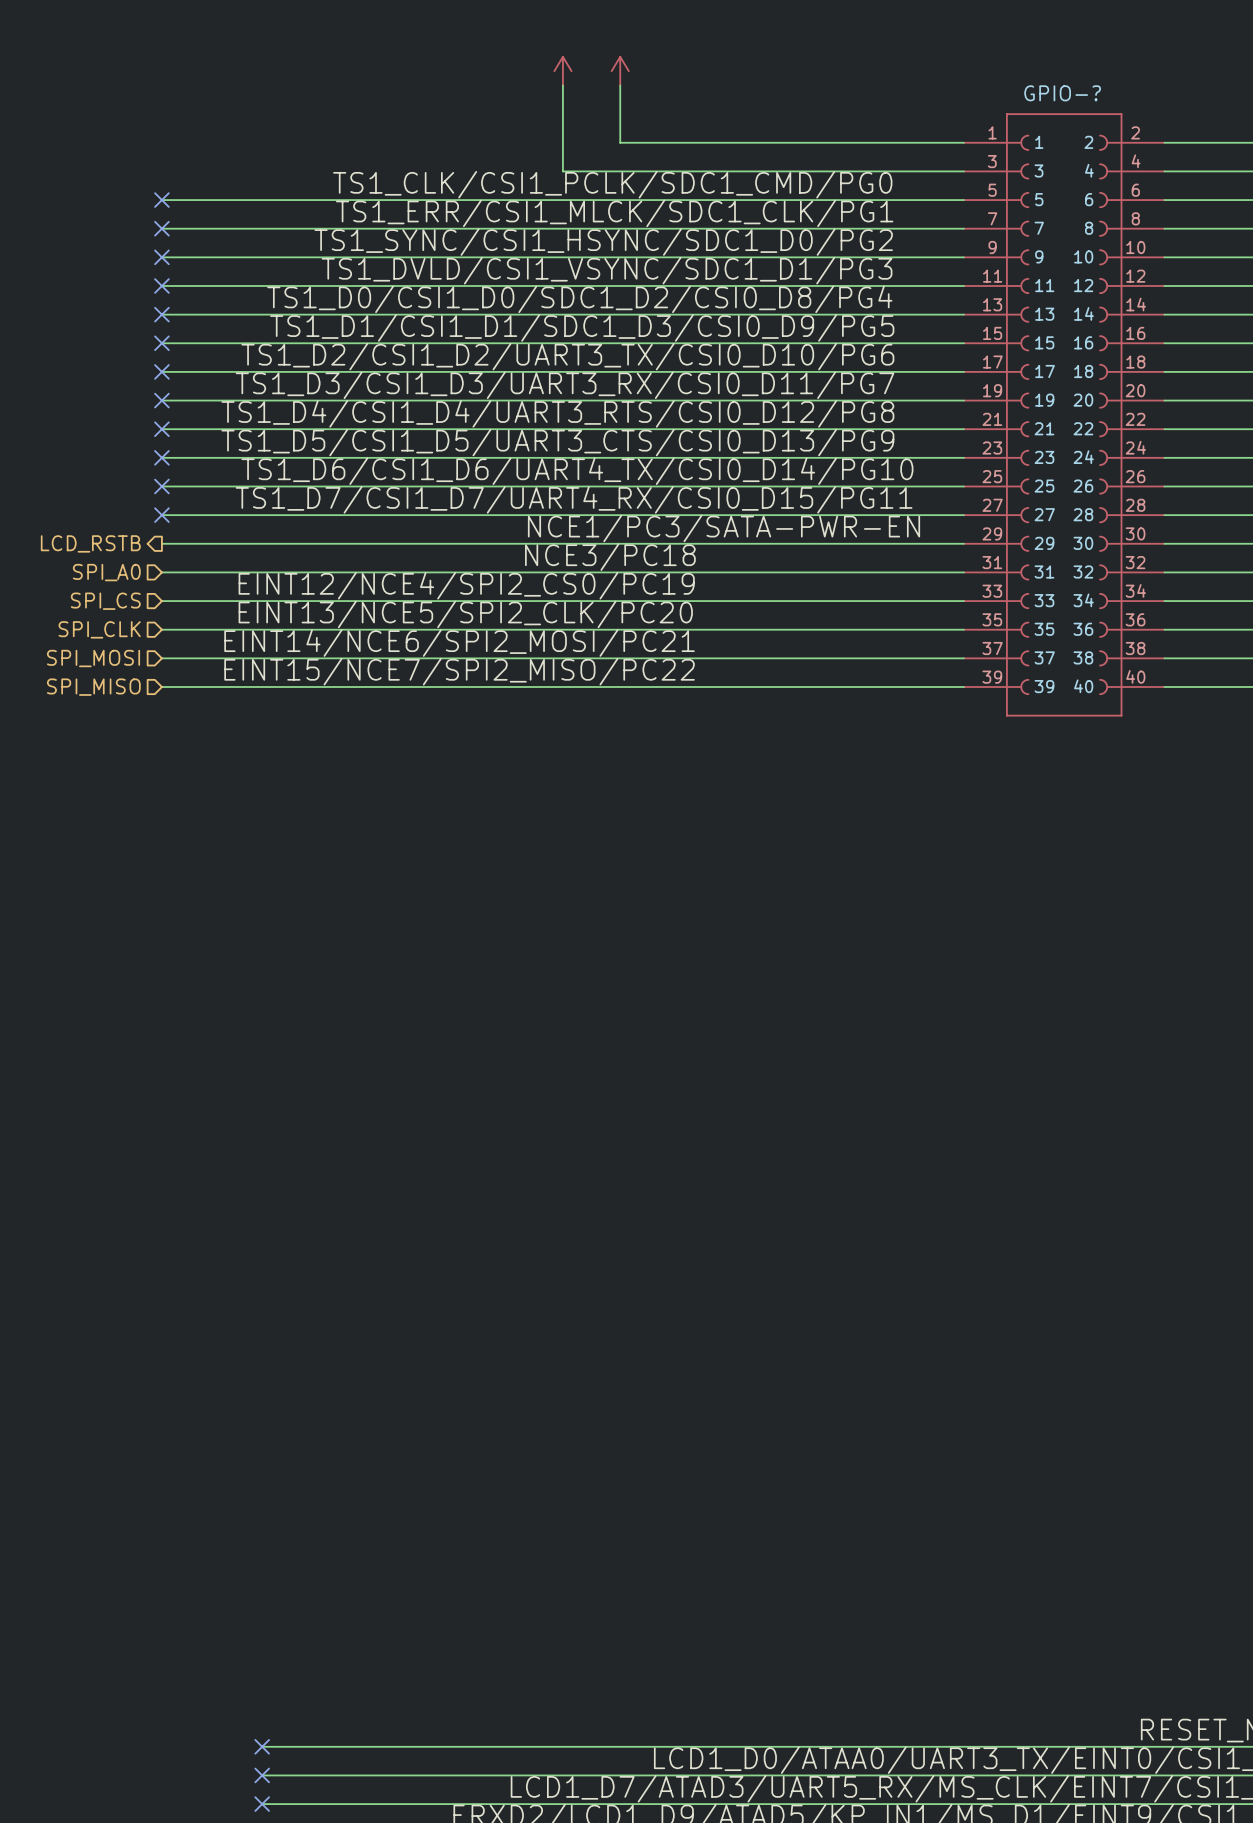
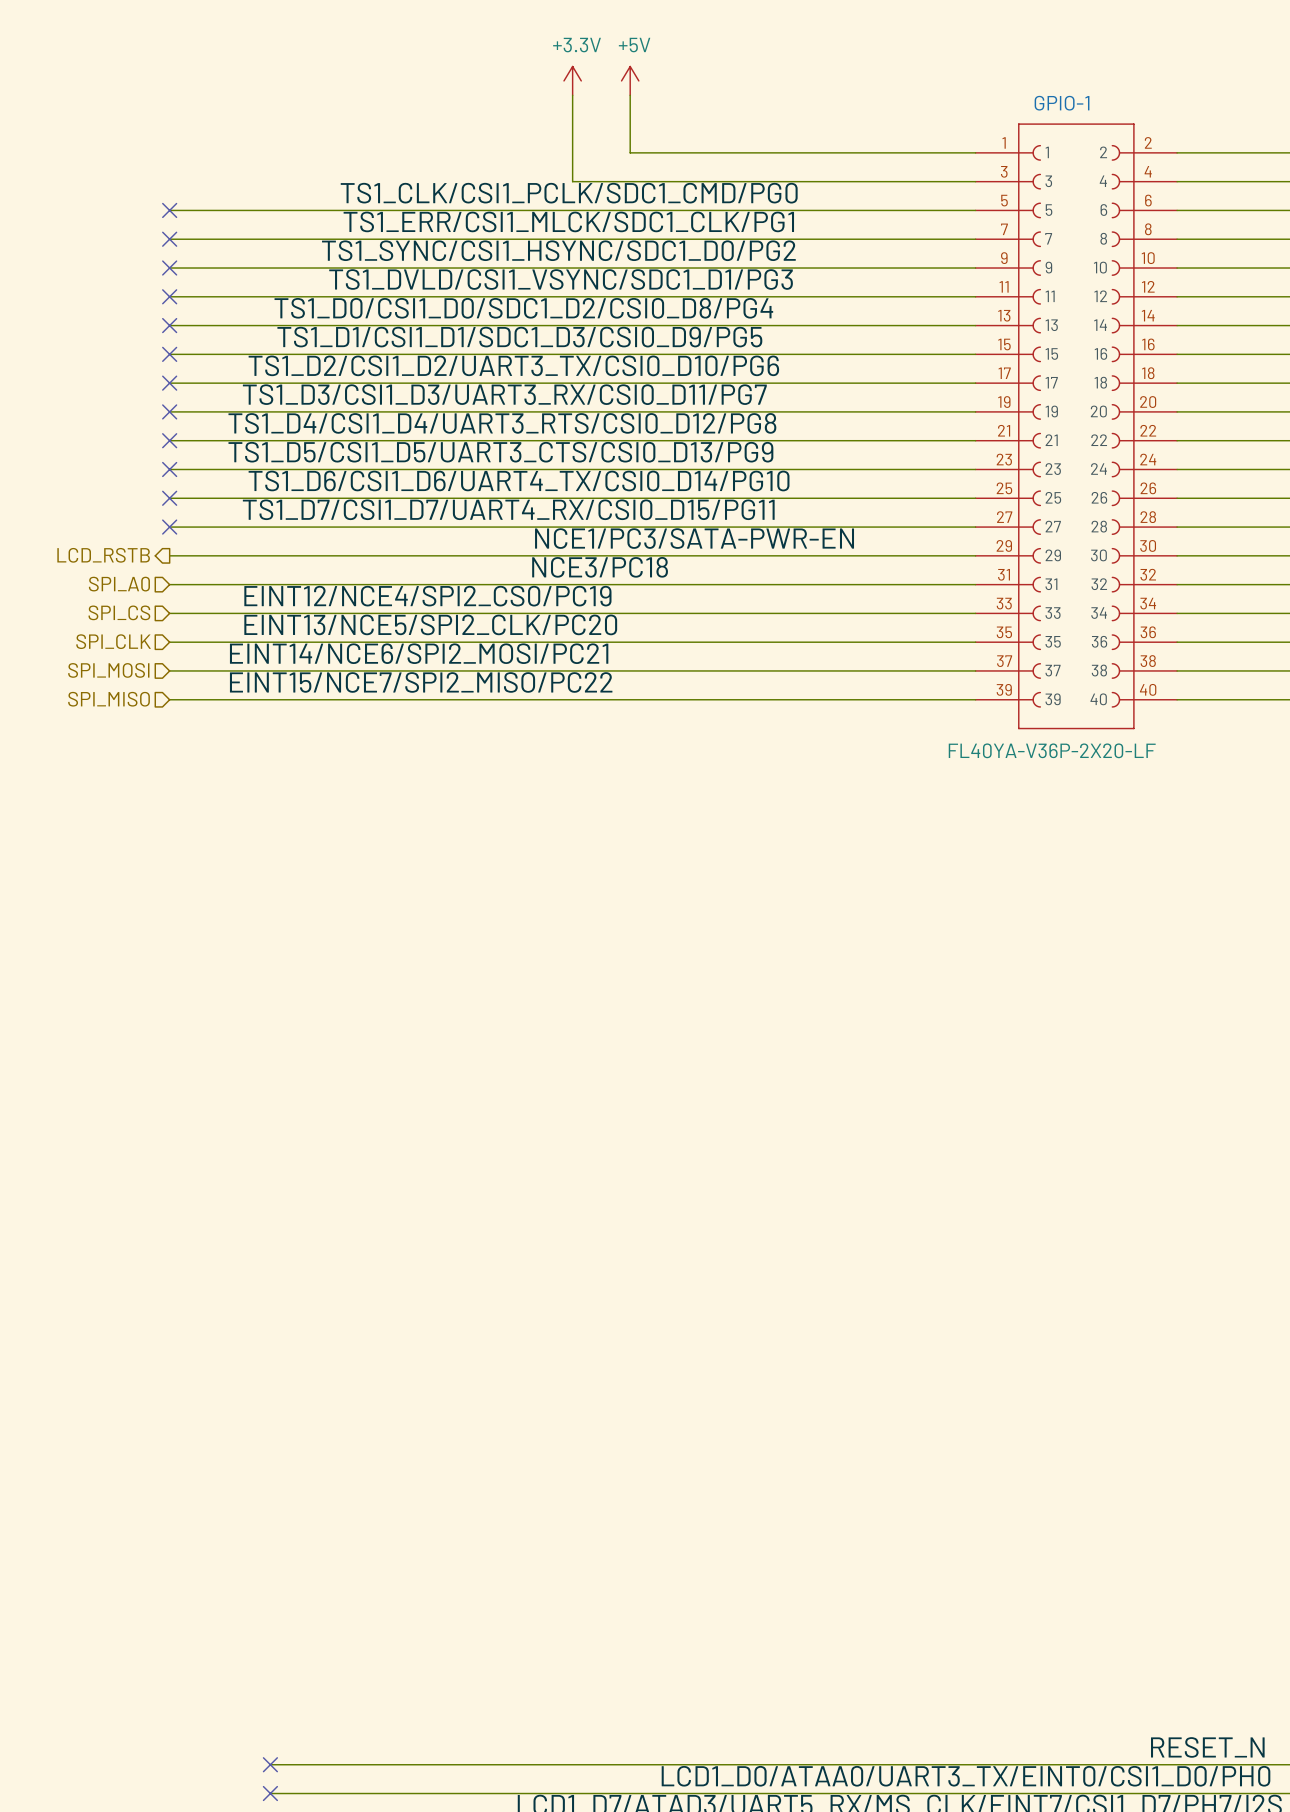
power symbol text: none -> +3.3V (577, 45)
power symbol text: none -> +5V (634, 45)
GPIO-? name: GPIO-? (1062, 93) -> GPIO-1 (1062, 103)
GPIO-? value: none -> FL40YA-V36P-2X20-LF (1052, 750)

